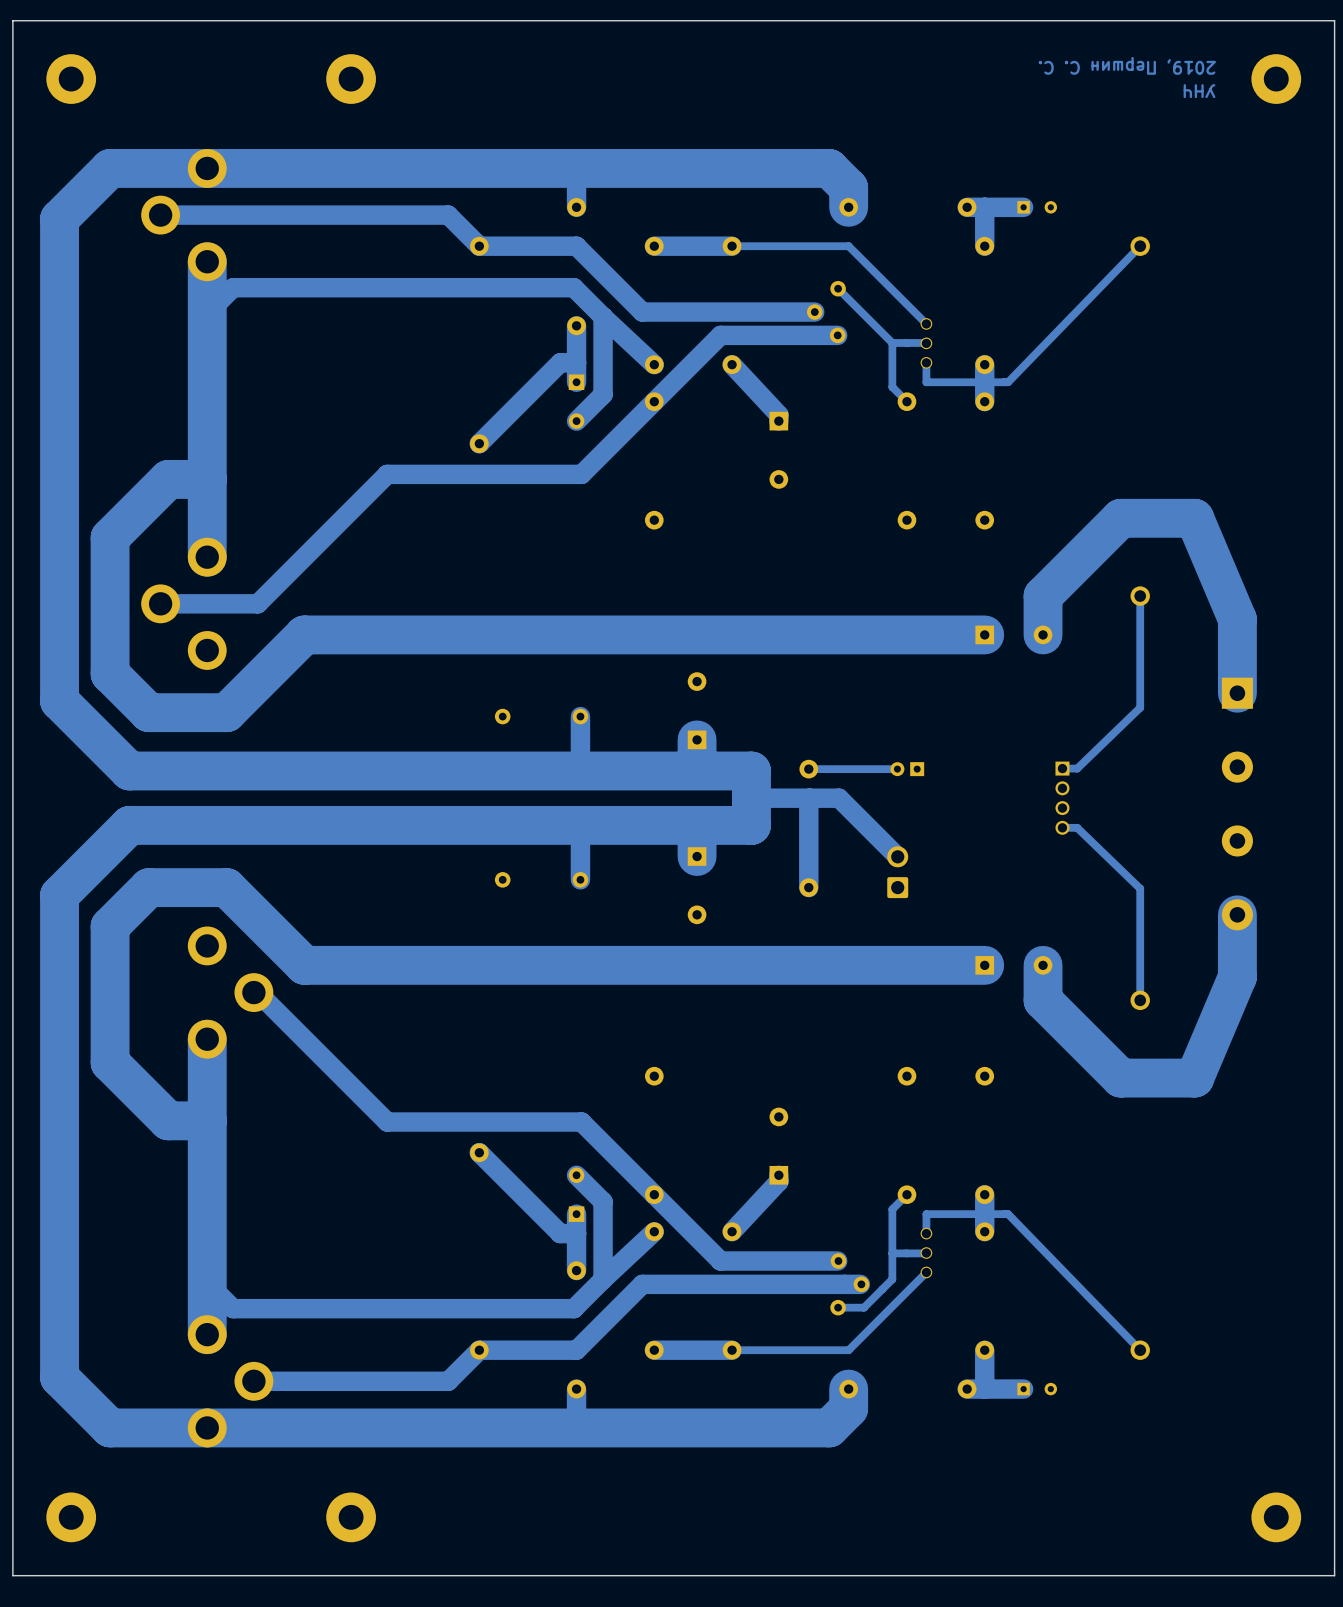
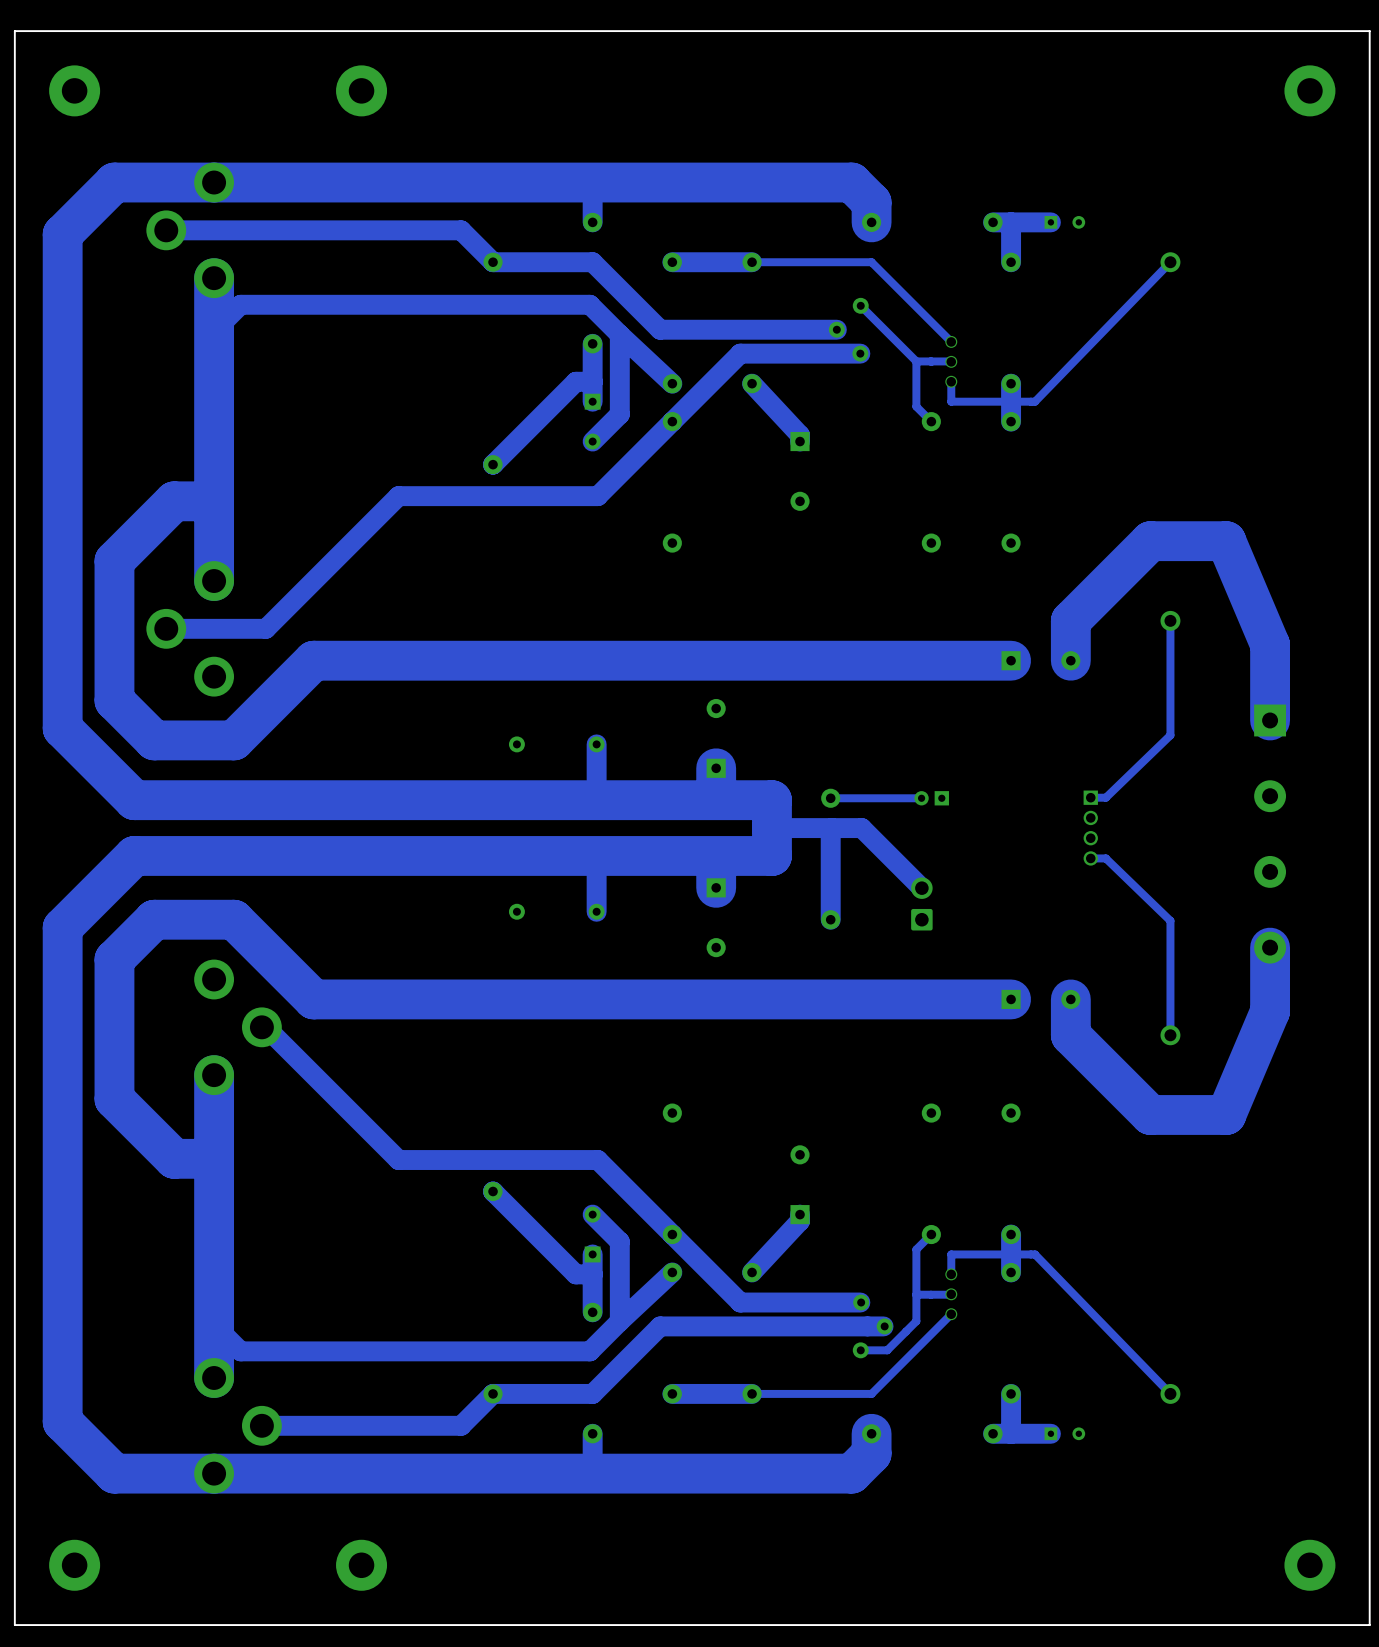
text: 2019, Першин С. С. (1127, 65) -> none
text: УНЧ (1199, 91) -> none

